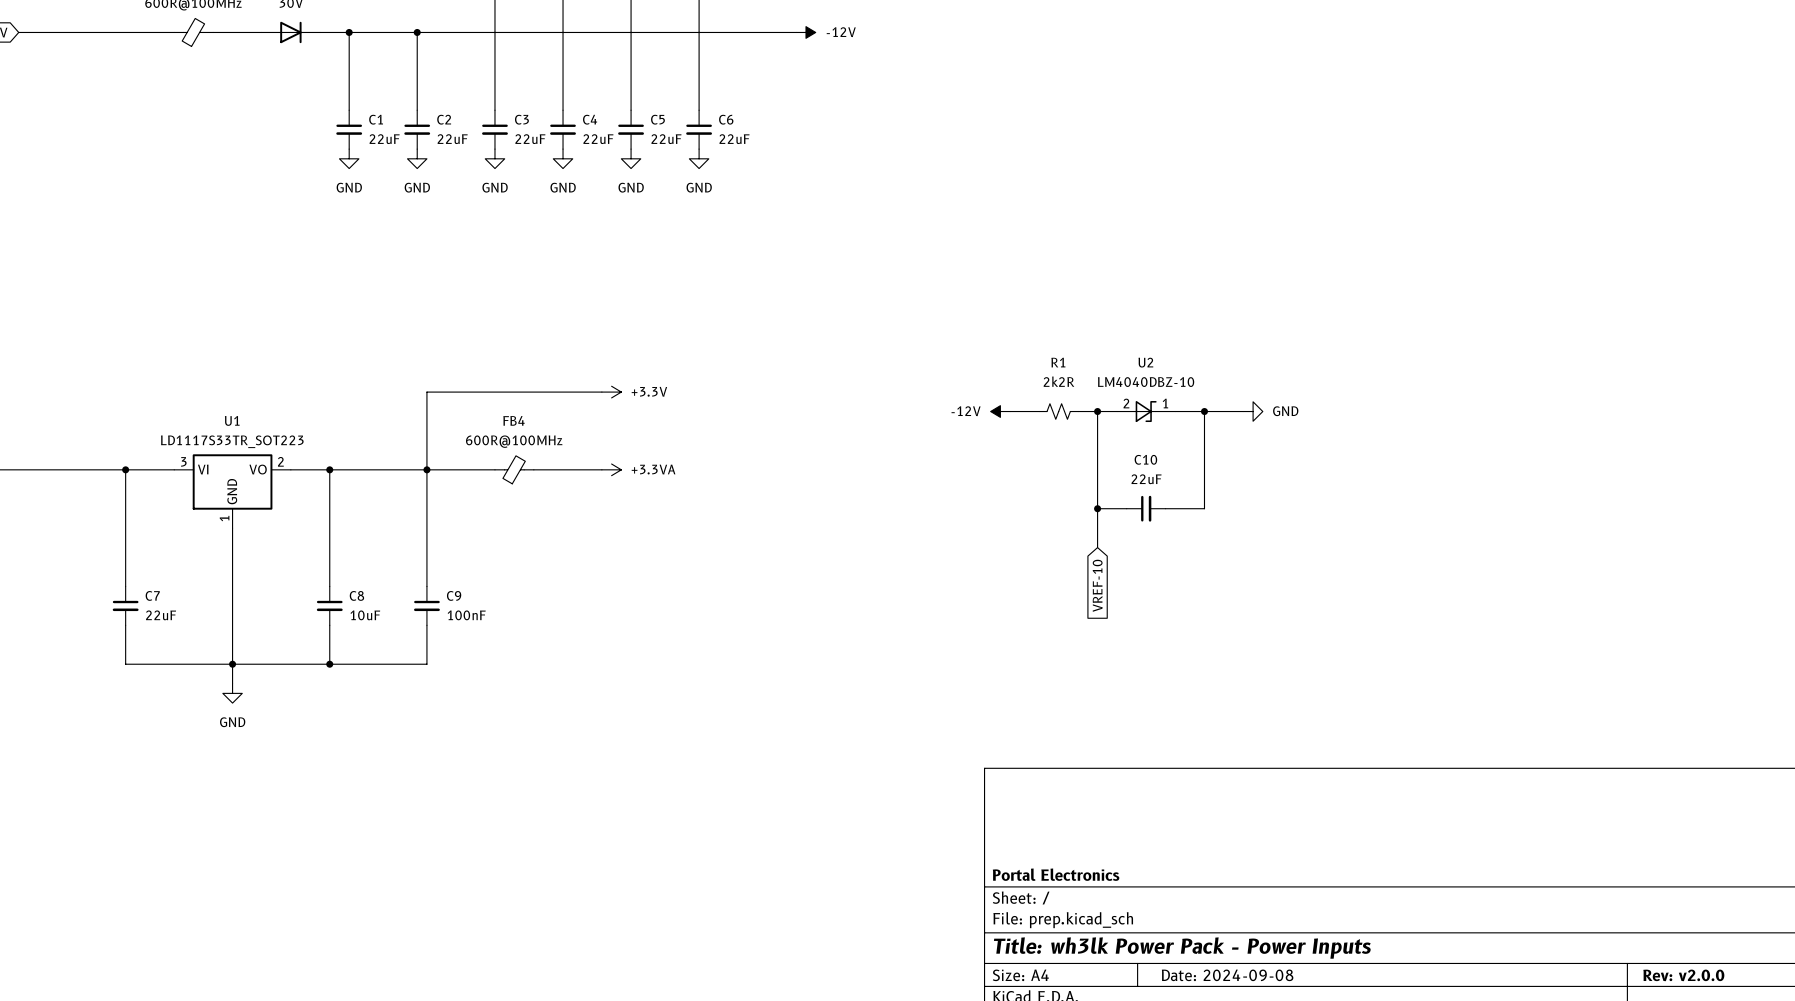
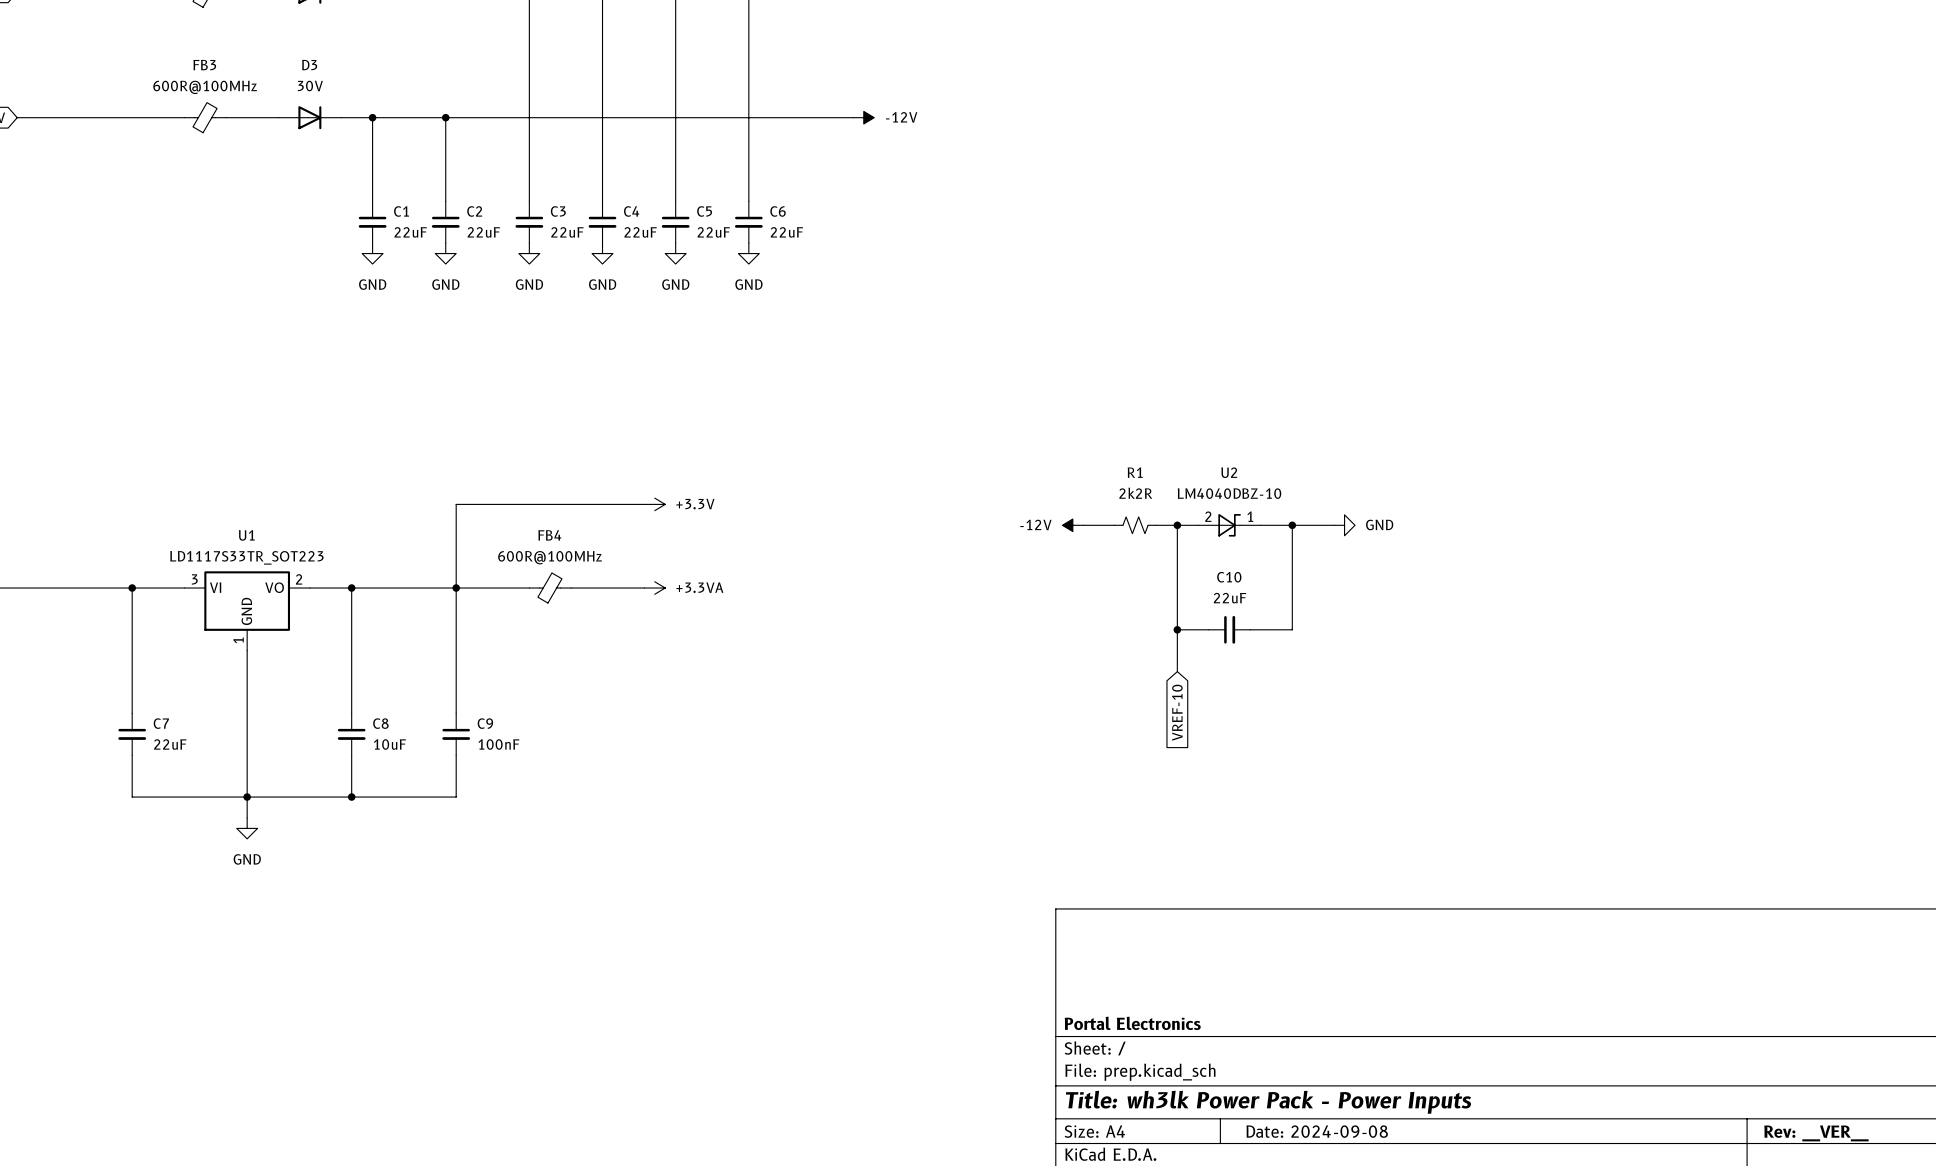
title block: Rev: v2.0.0 (1683, 975) -> Rev: __VER__ (1816, 1133)

